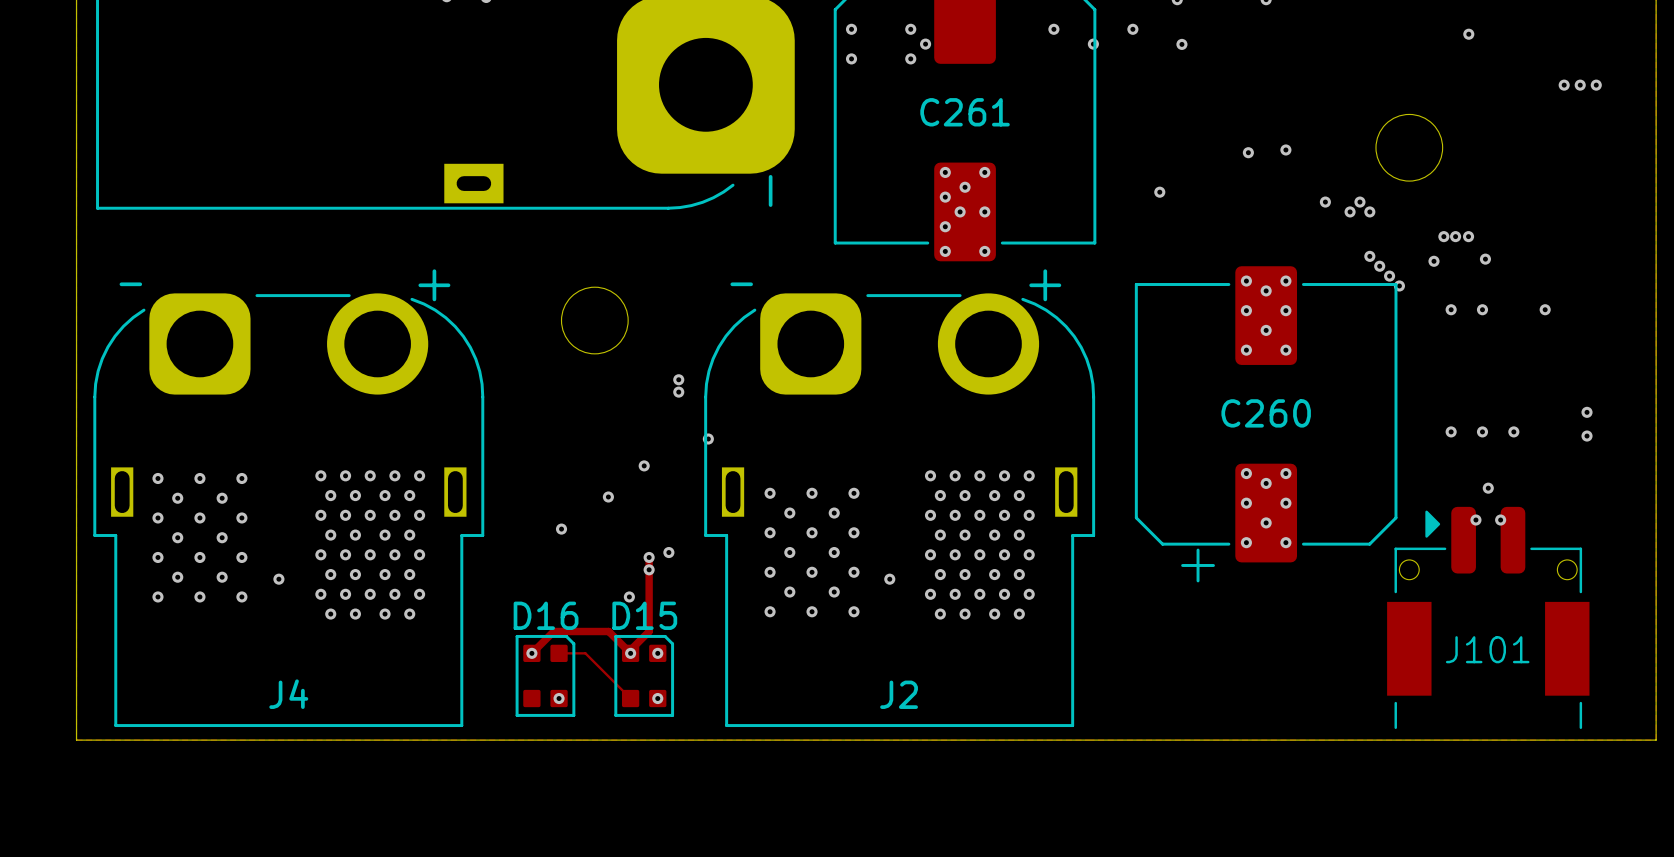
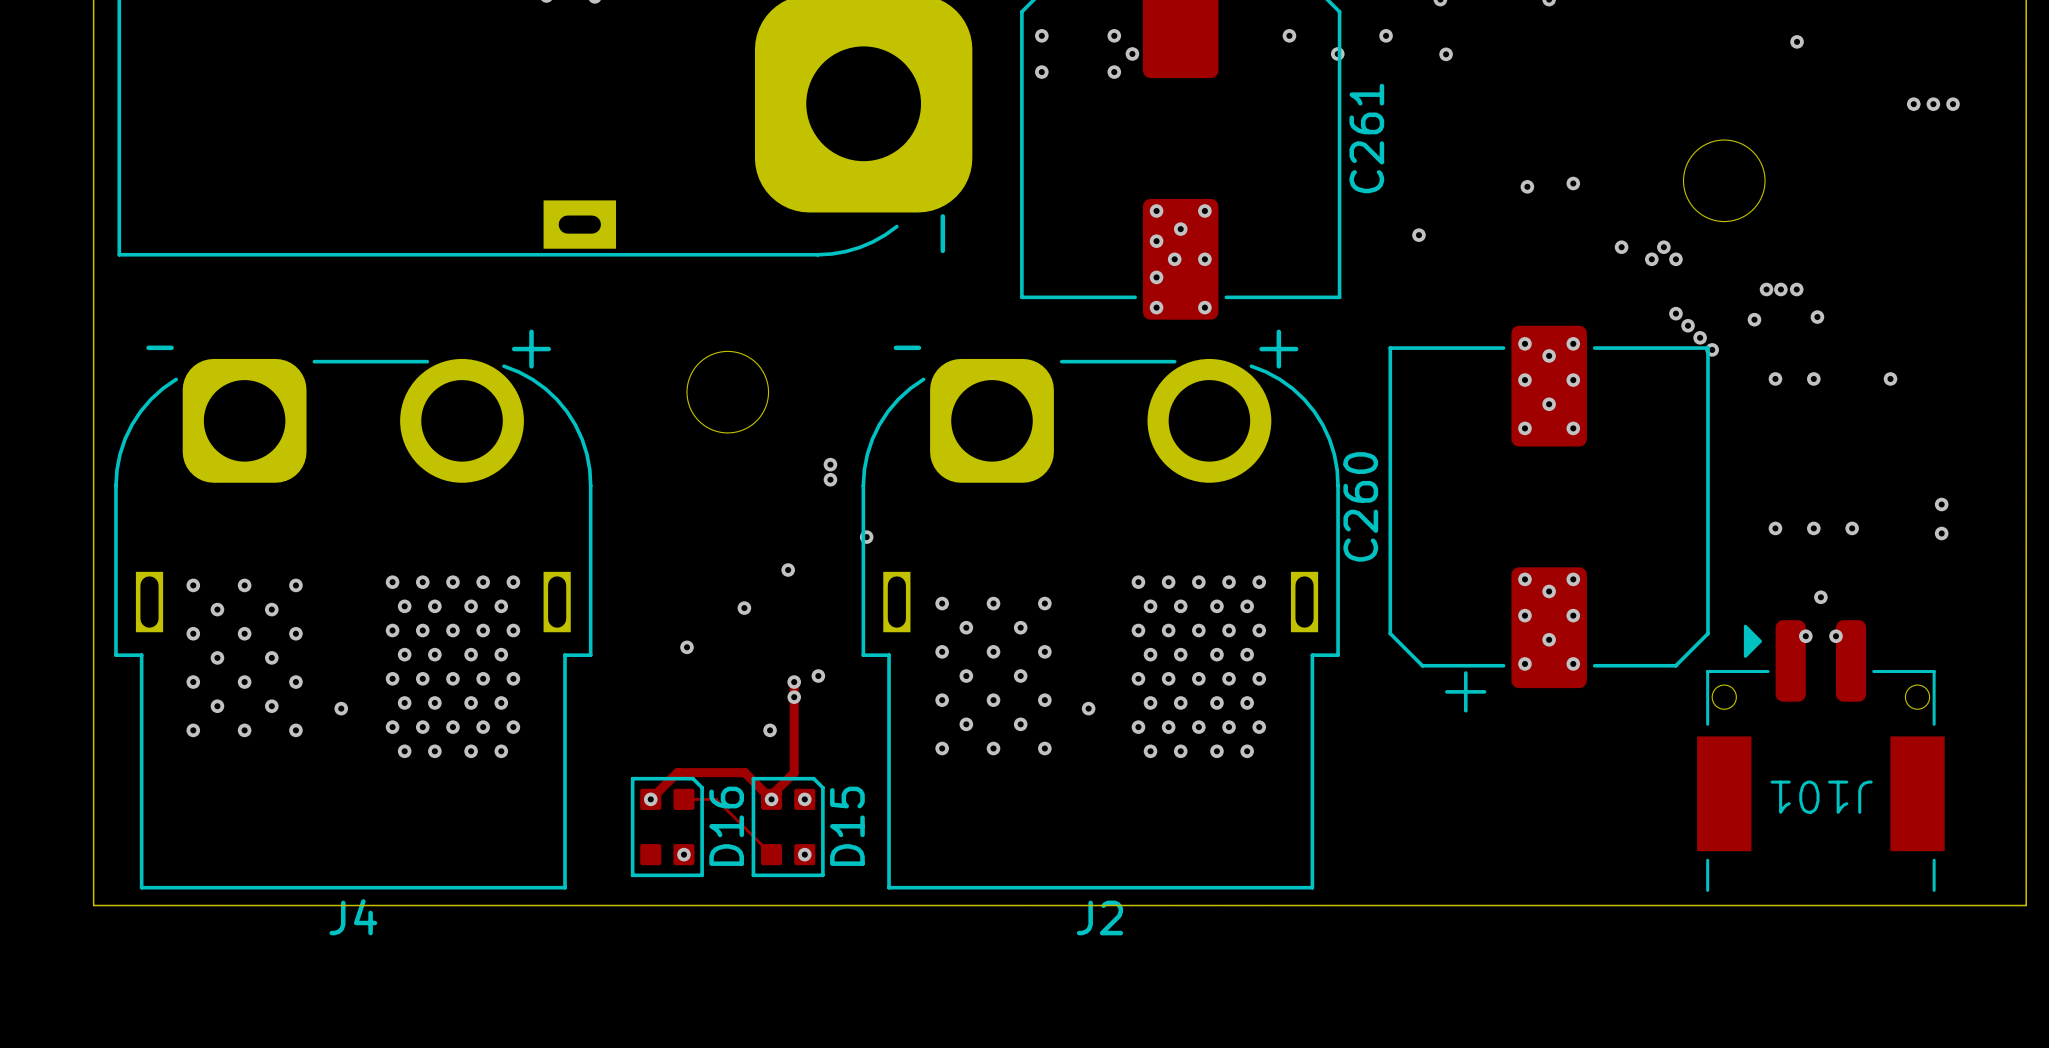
C261 name rotation: 0° (965, 112) -> 90° counterclockwise (1366, 138)
C261 name position: C261 (965, 112) -> C261 (1366, 138)
C260 name rotation: 0° (1266, 413) -> 90° counterclockwise (1360, 506)
C260 name position: C260 (1266, 413) -> C260 (1360, 506)
D16 name rotation: 0° (546, 615) -> 90° counterclockwise (726, 826)
D15 name rotation: 0° (644, 615) -> 90° counterclockwise (847, 826)
J101 name rotation: 0° (1487, 649) -> 180° (1821, 797)
J4 name position: J4 (288, 694) -> J4 (353, 917)
J2 name position: J2 (899, 694) -> J2 (1099, 917)

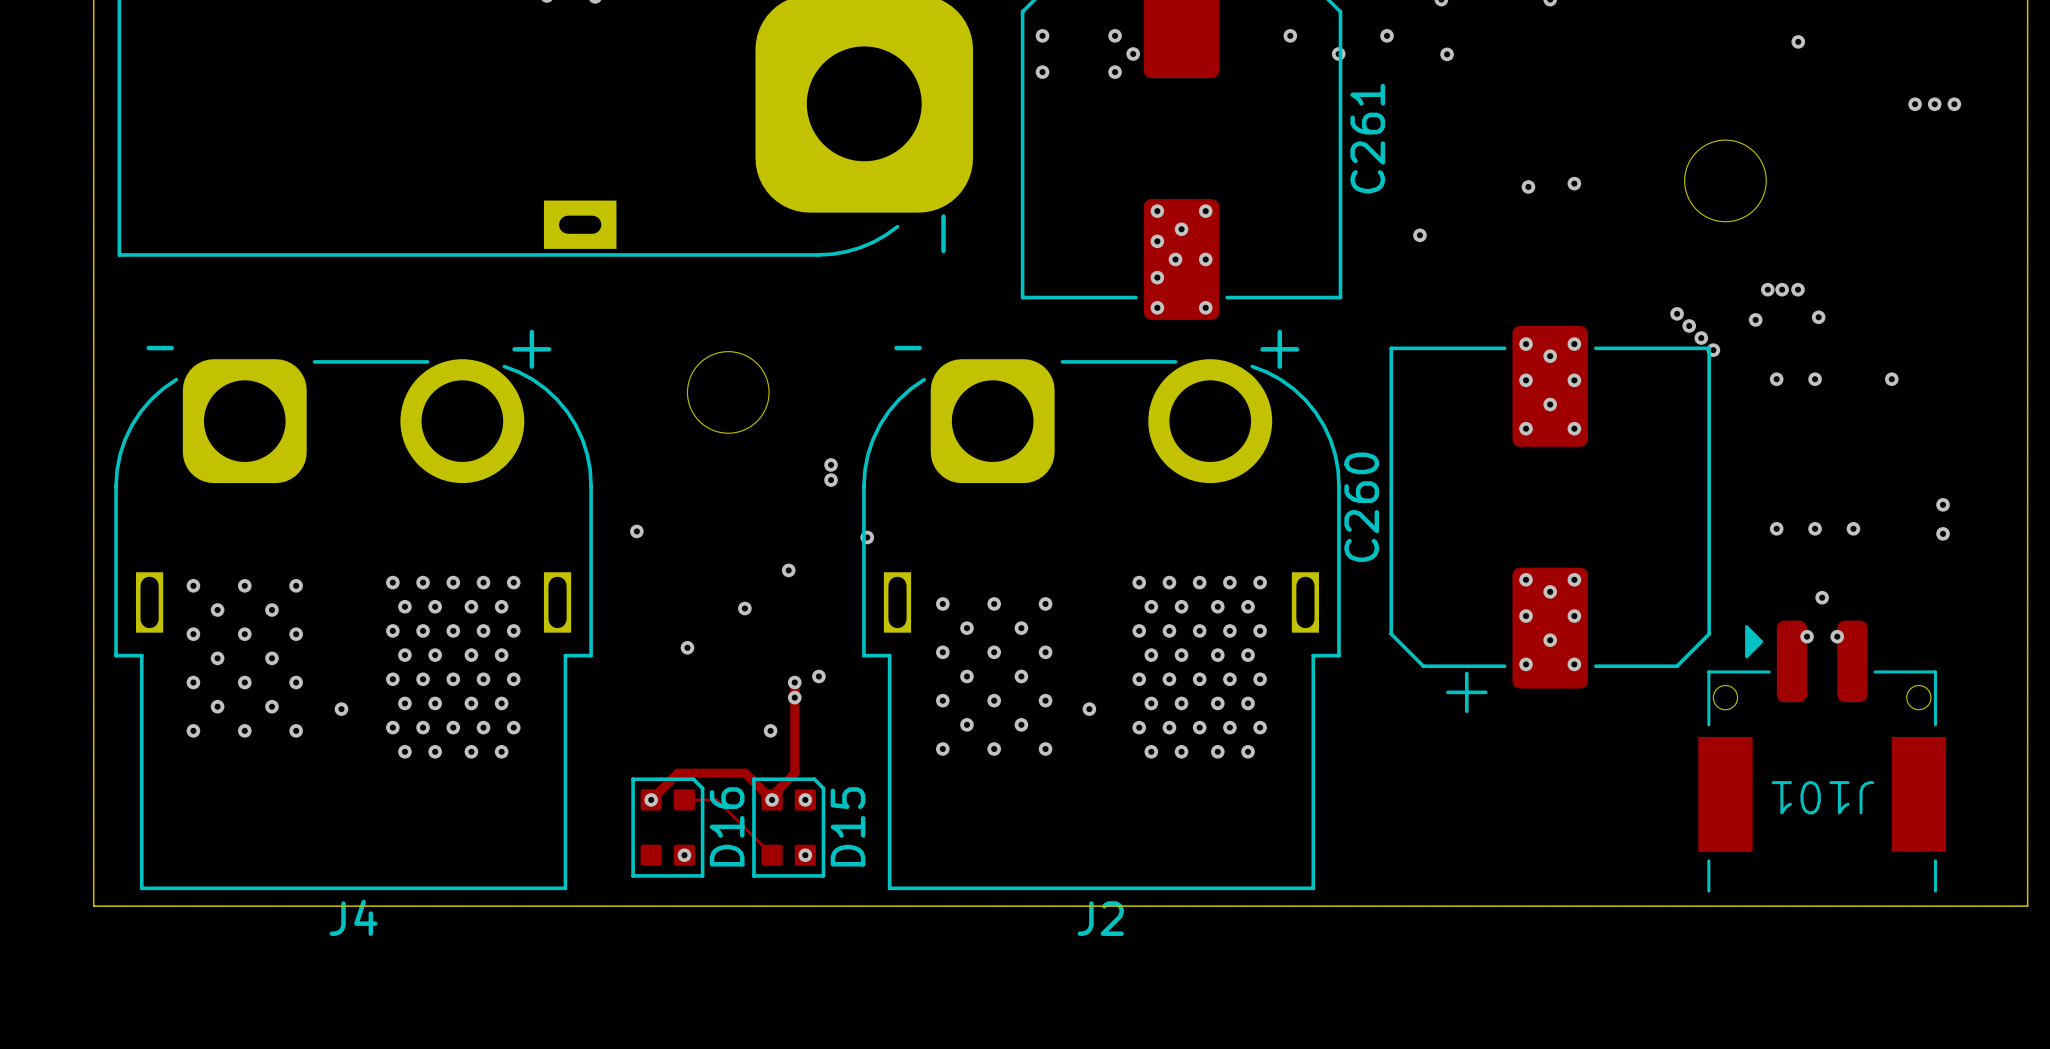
via: (1621, 247) -> none
via: (1663, 247) -> none
via: (1651, 259) -> none
via: (1675, 259) -> none
via: none -> (636, 531)

